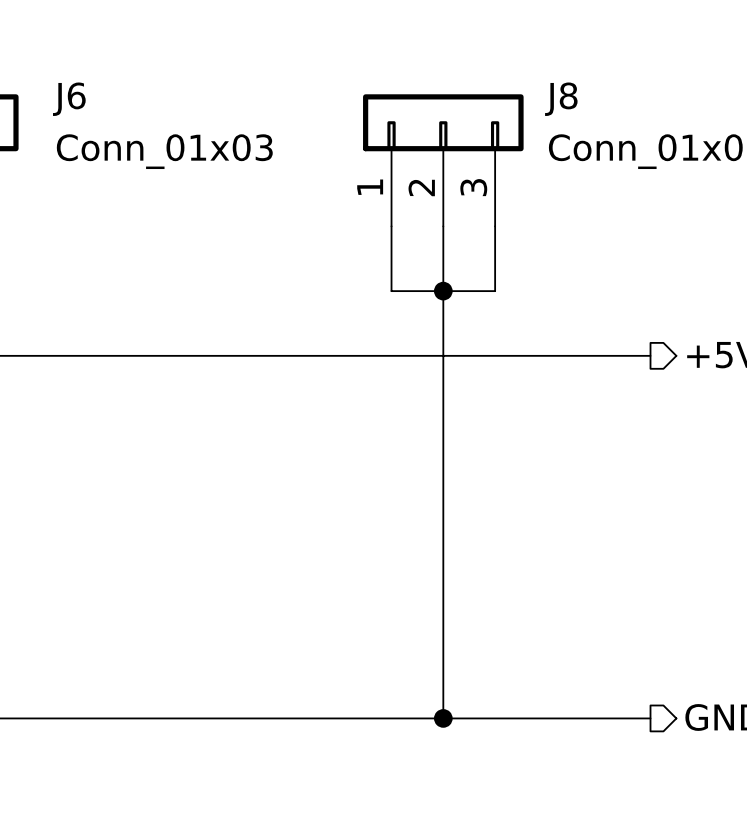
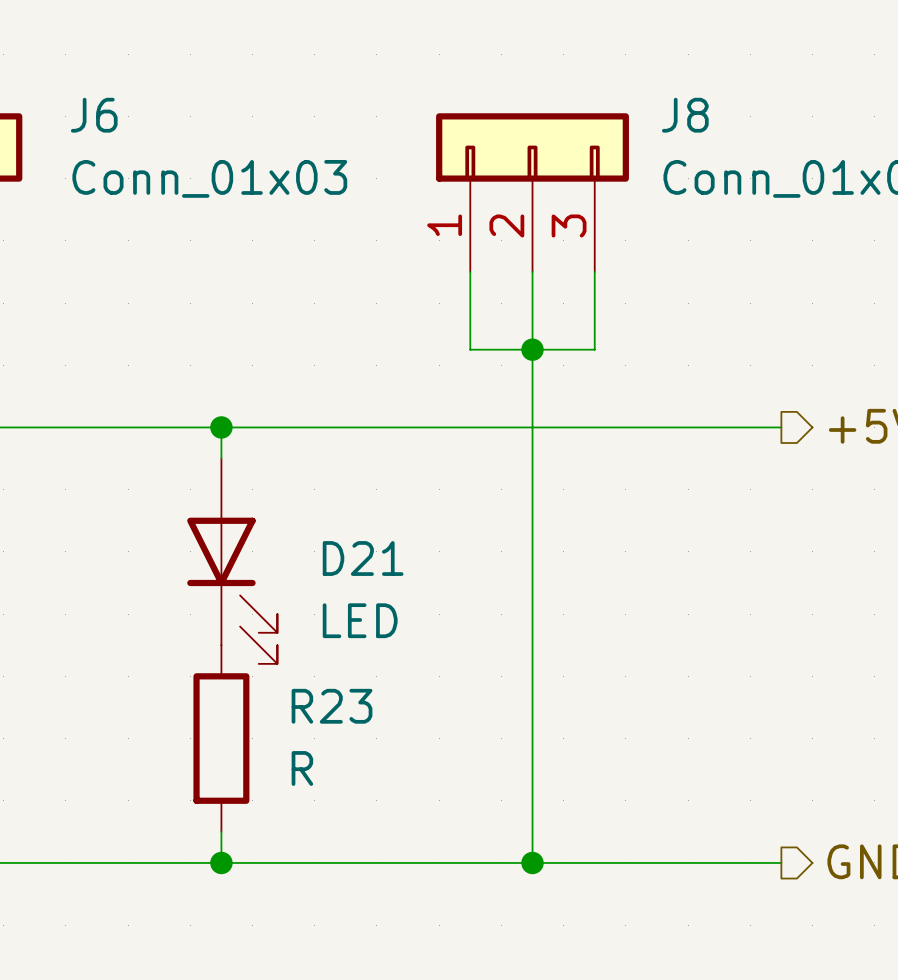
wire: none -> (221, 427) (221, 458)
junction: none -> (221, 427)
D21: none -> LED (232, 561)
R23: none -> R (221, 738)
wire: none -> (221, 831) (221, 862)
junction: none -> (221, 862)

